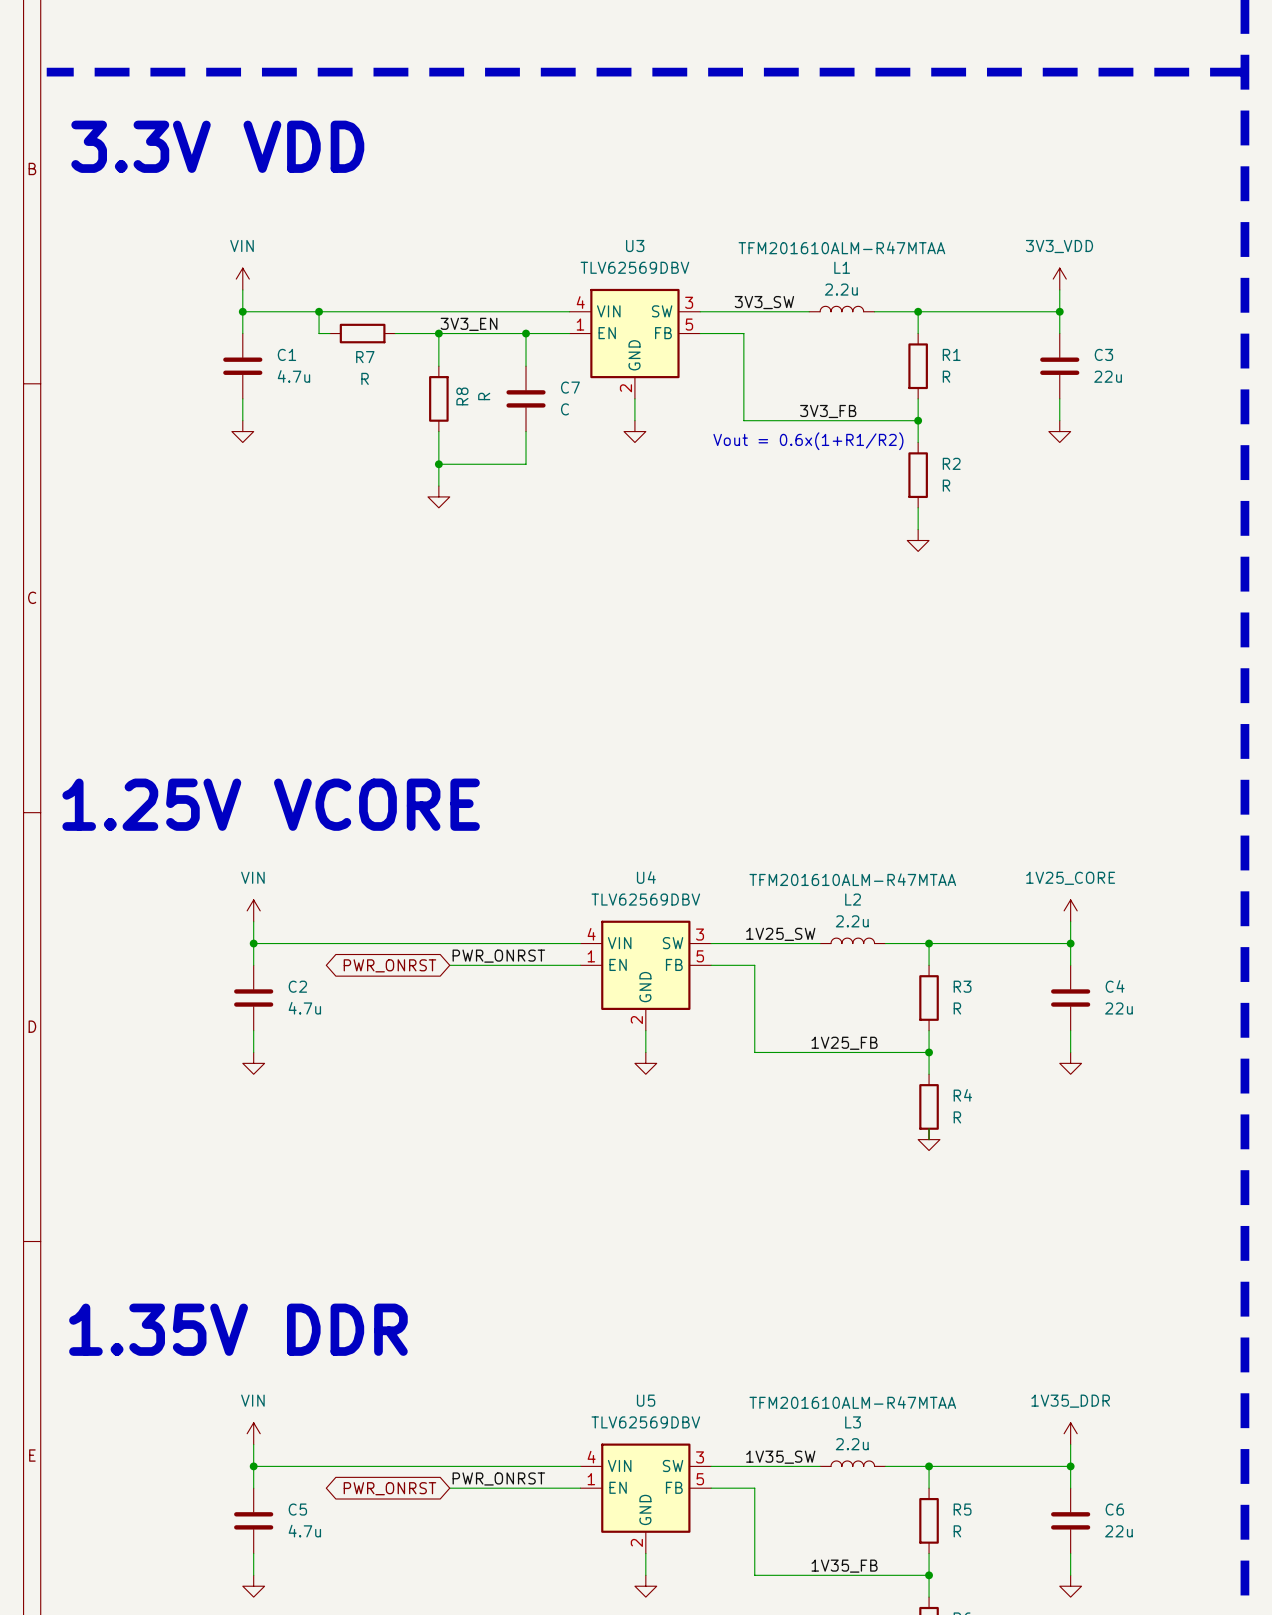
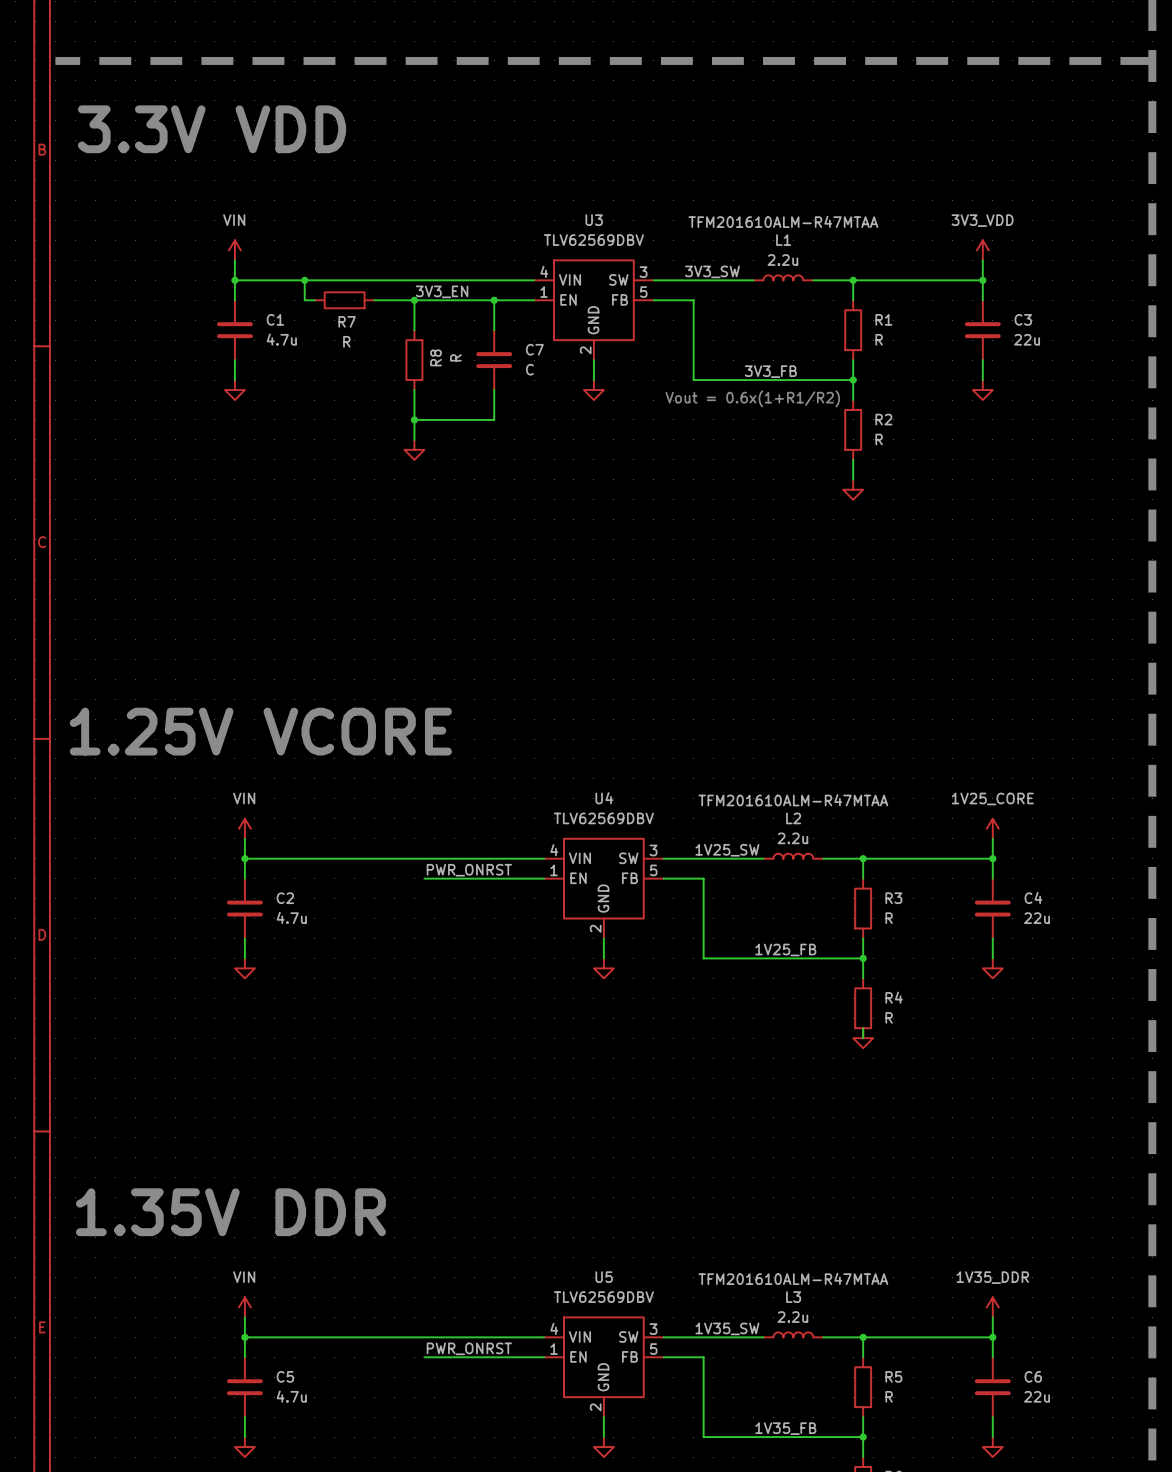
global label: PWR_ONRST (389, 965) -> none
global label: PWR_ONRST (389, 1488) -> none

